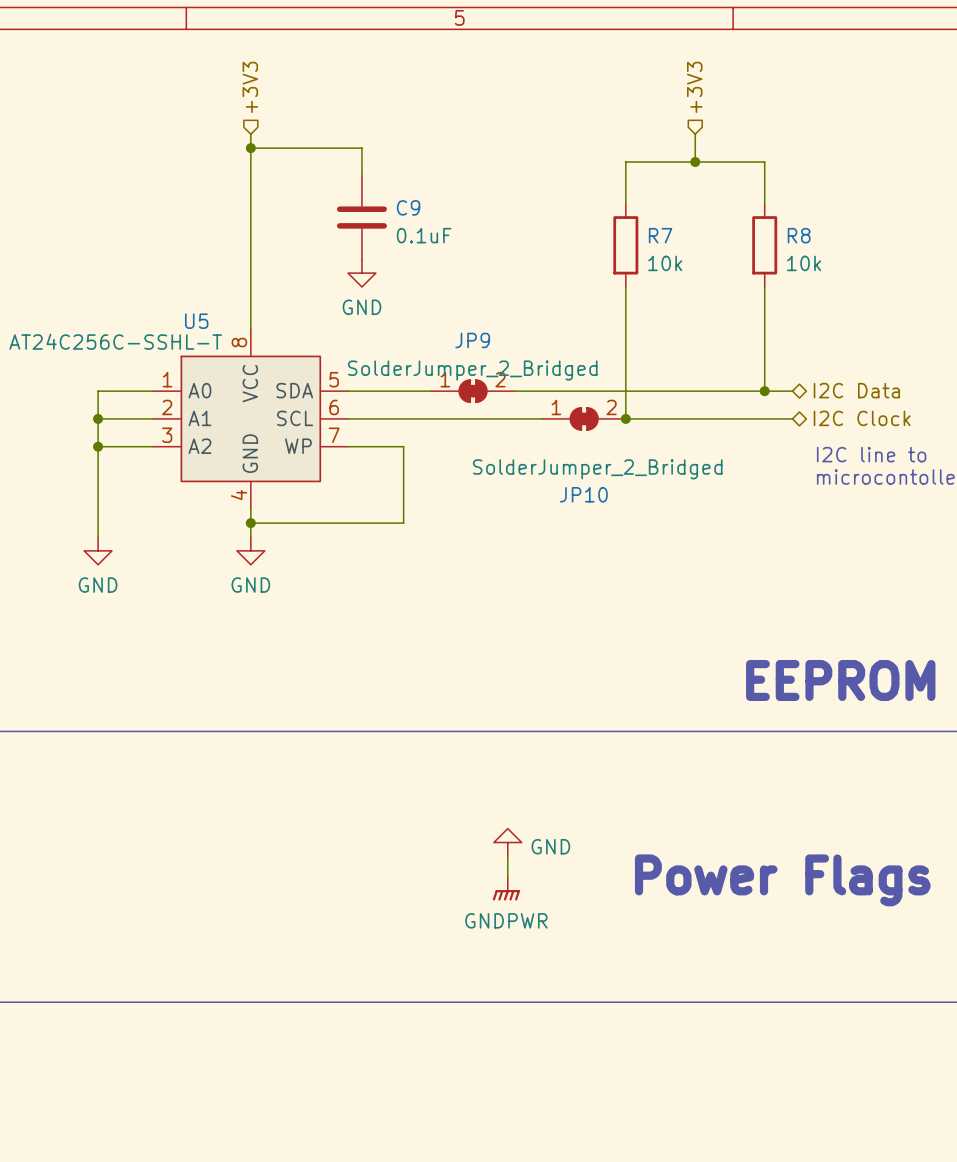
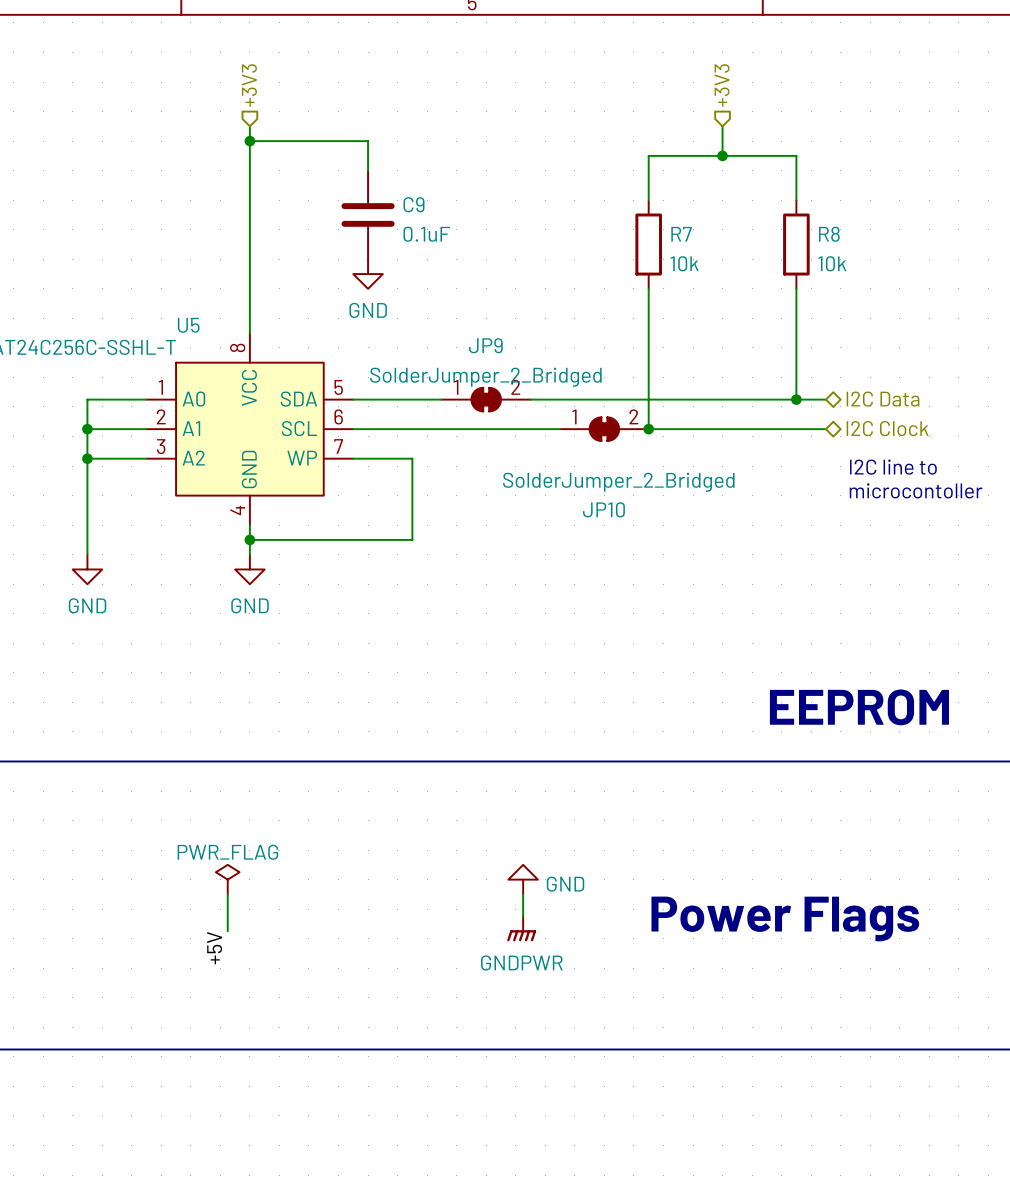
power symbol: none -> PWR_FLAG (227, 879)
wire: none -> (227, 894) (227, 931)
label: none -> +5V (214, 948)

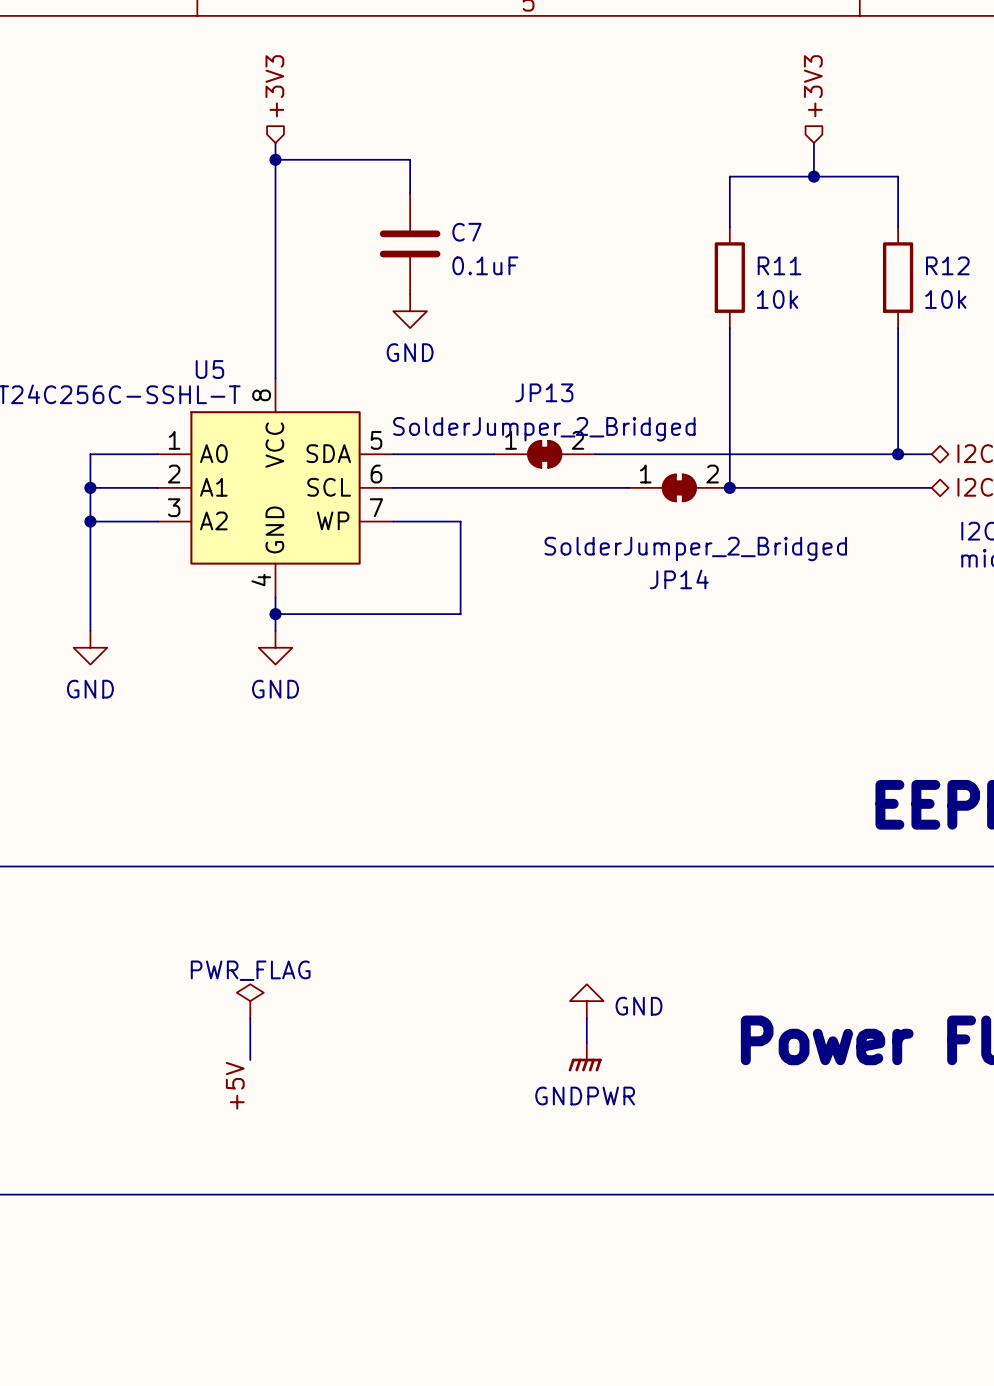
C9 name: C9 (414, 204) -> C7 (466, 232)
R7 name: R7 (681, 234) -> R11 (779, 265)
R8 name: R8 (829, 234) -> R12 (947, 265)
JP9 name: JP9 (485, 345) -> JP13 (544, 392)
JP10 name: JP10 (603, 509) -> JP14 (679, 579)

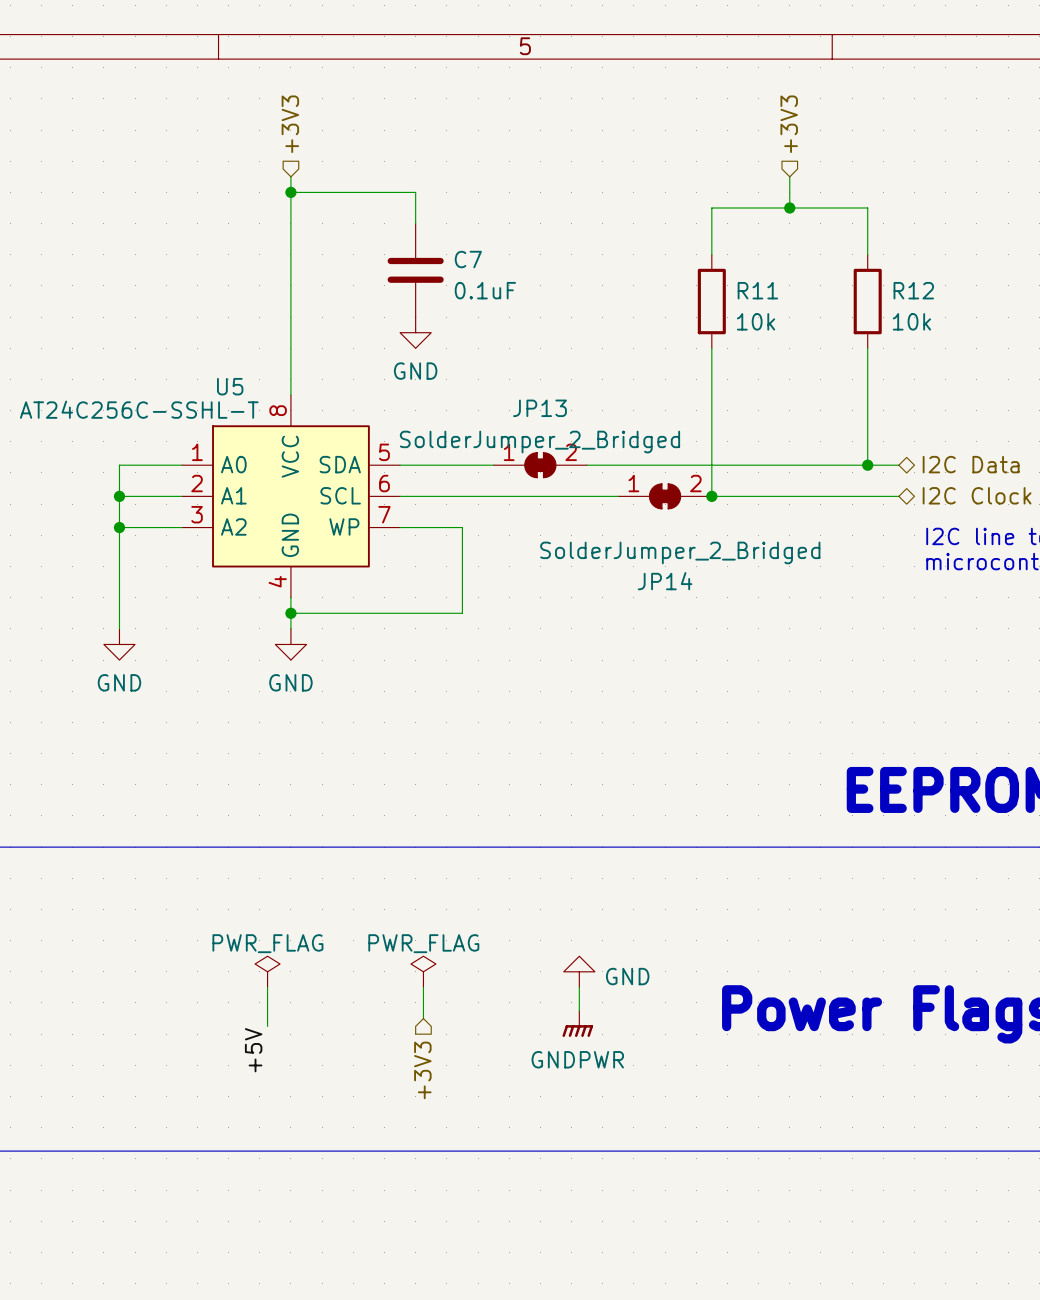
power symbol: none -> PWR_FLAG (423, 971)
wire: none -> (423, 987) (423, 1018)
hierarchical label: none -> +3V3 (422, 1070)

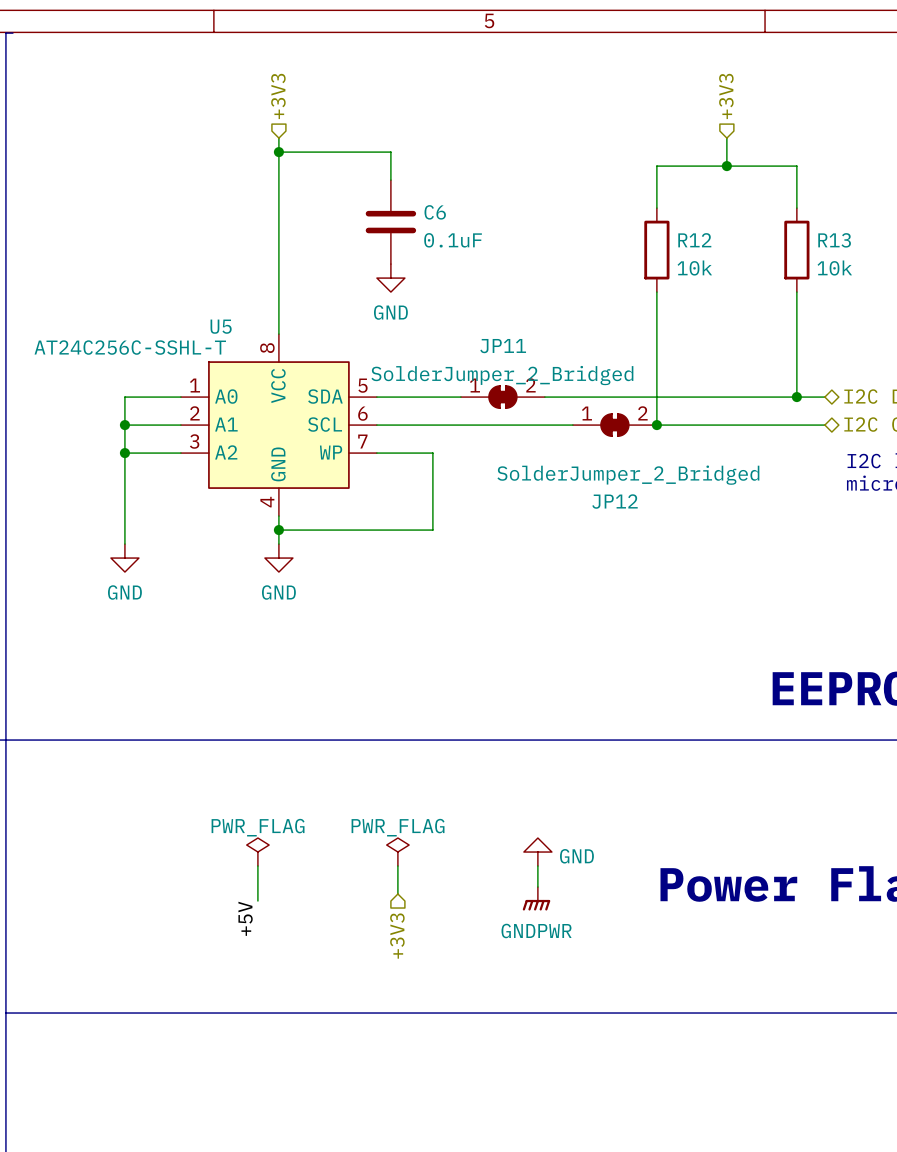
C7 name: C7 (468, 259) -> C6 (435, 212)
R11 name: R11 (757, 290) -> R12 (694, 240)
R12 name: R12 (913, 290) -> R13 (834, 240)
JP13 name: JP13 (539, 408) -> JP11 (503, 346)
JP14 name: JP14 (665, 581) -> JP12 (615, 501)

